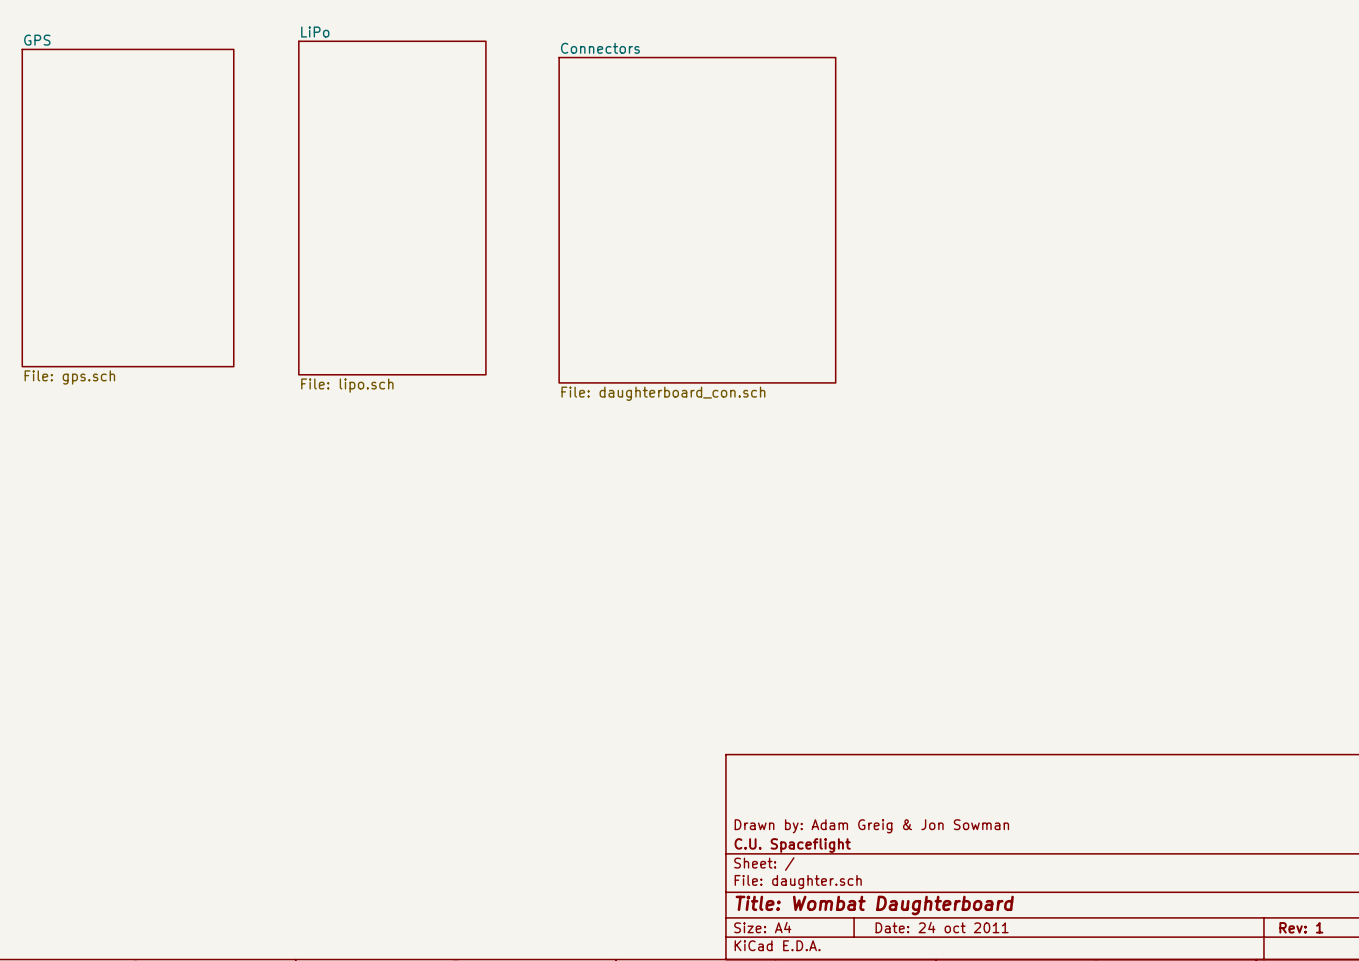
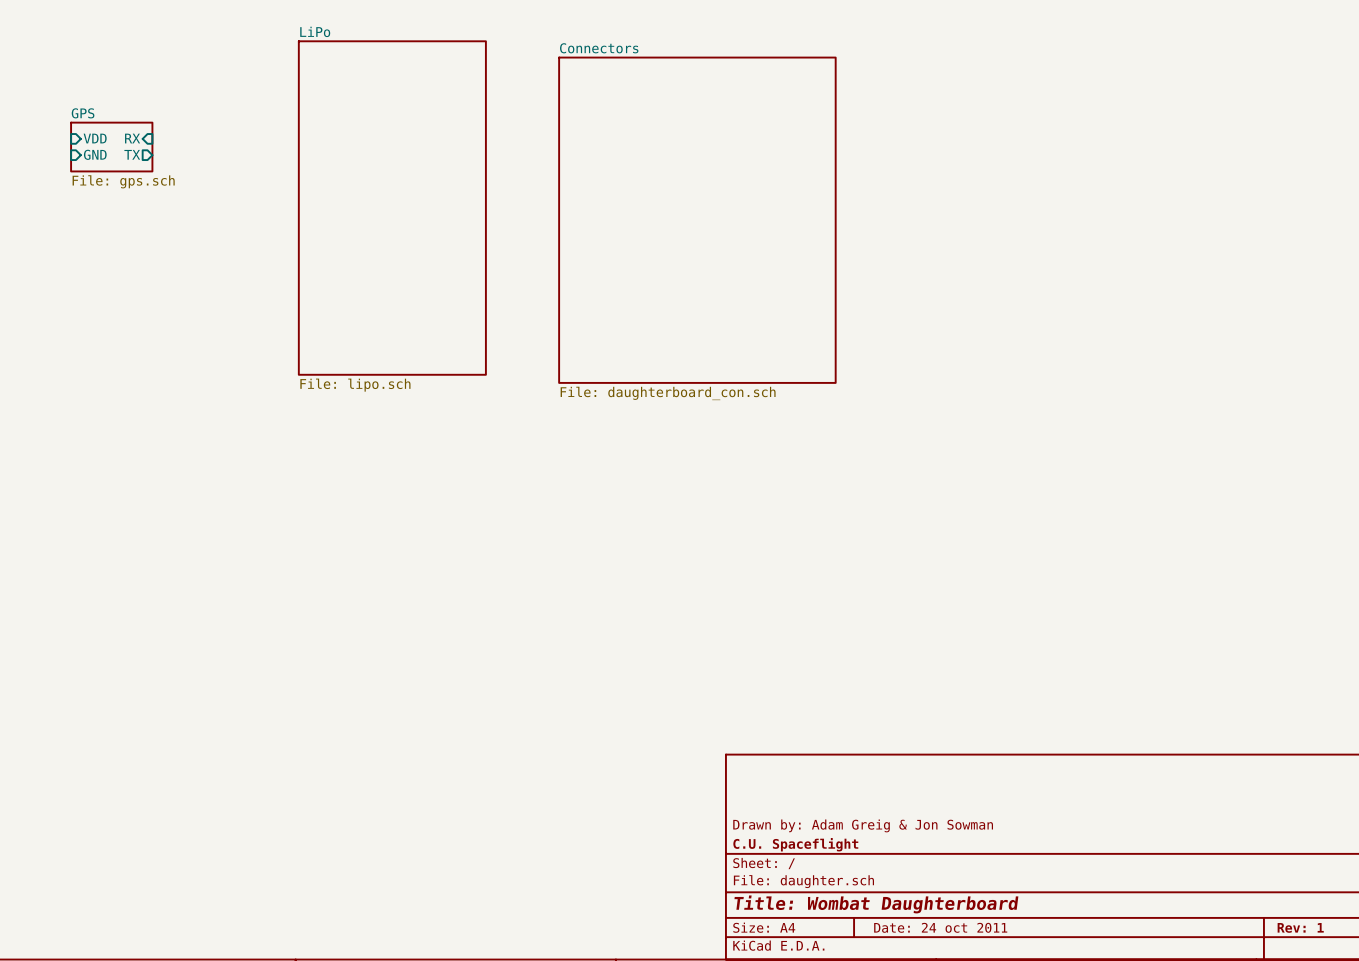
sheet pin: none -> VDD (95, 138)
sheet pin: none -> RX (132, 138)
sheet GPS: none -> File: gps.sch (111, 147)
sheet pin: none -> GND (95, 154)
sheet pin: none -> TX (132, 154)
sheet GPS: File: gps.sch (128, 208) -> none

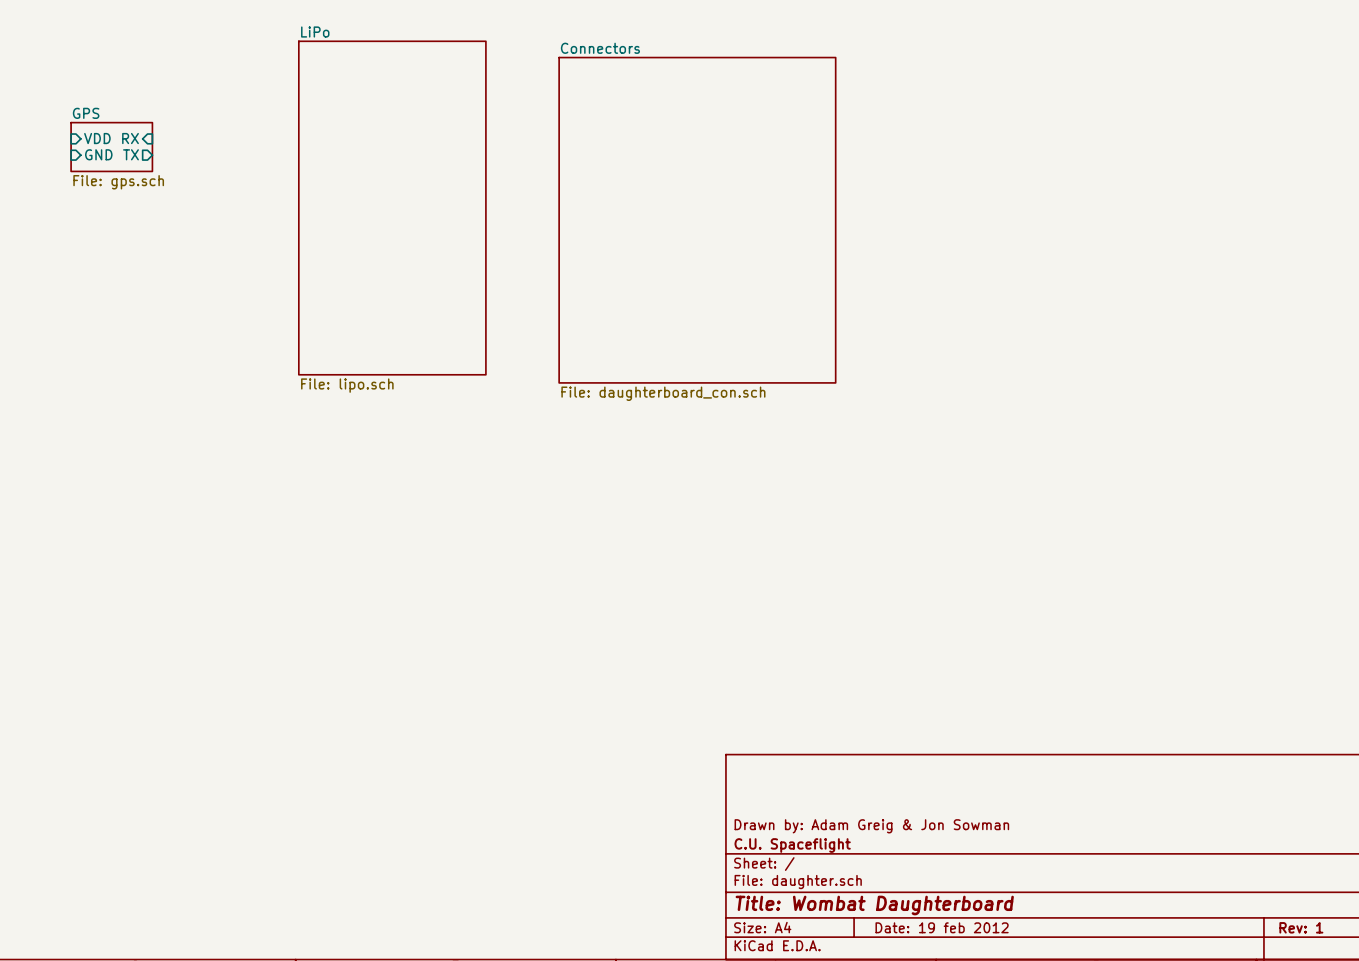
title block: Date: 24 oct 2011 (940, 927) -> Date: 19 feb 2012 (942, 927)

